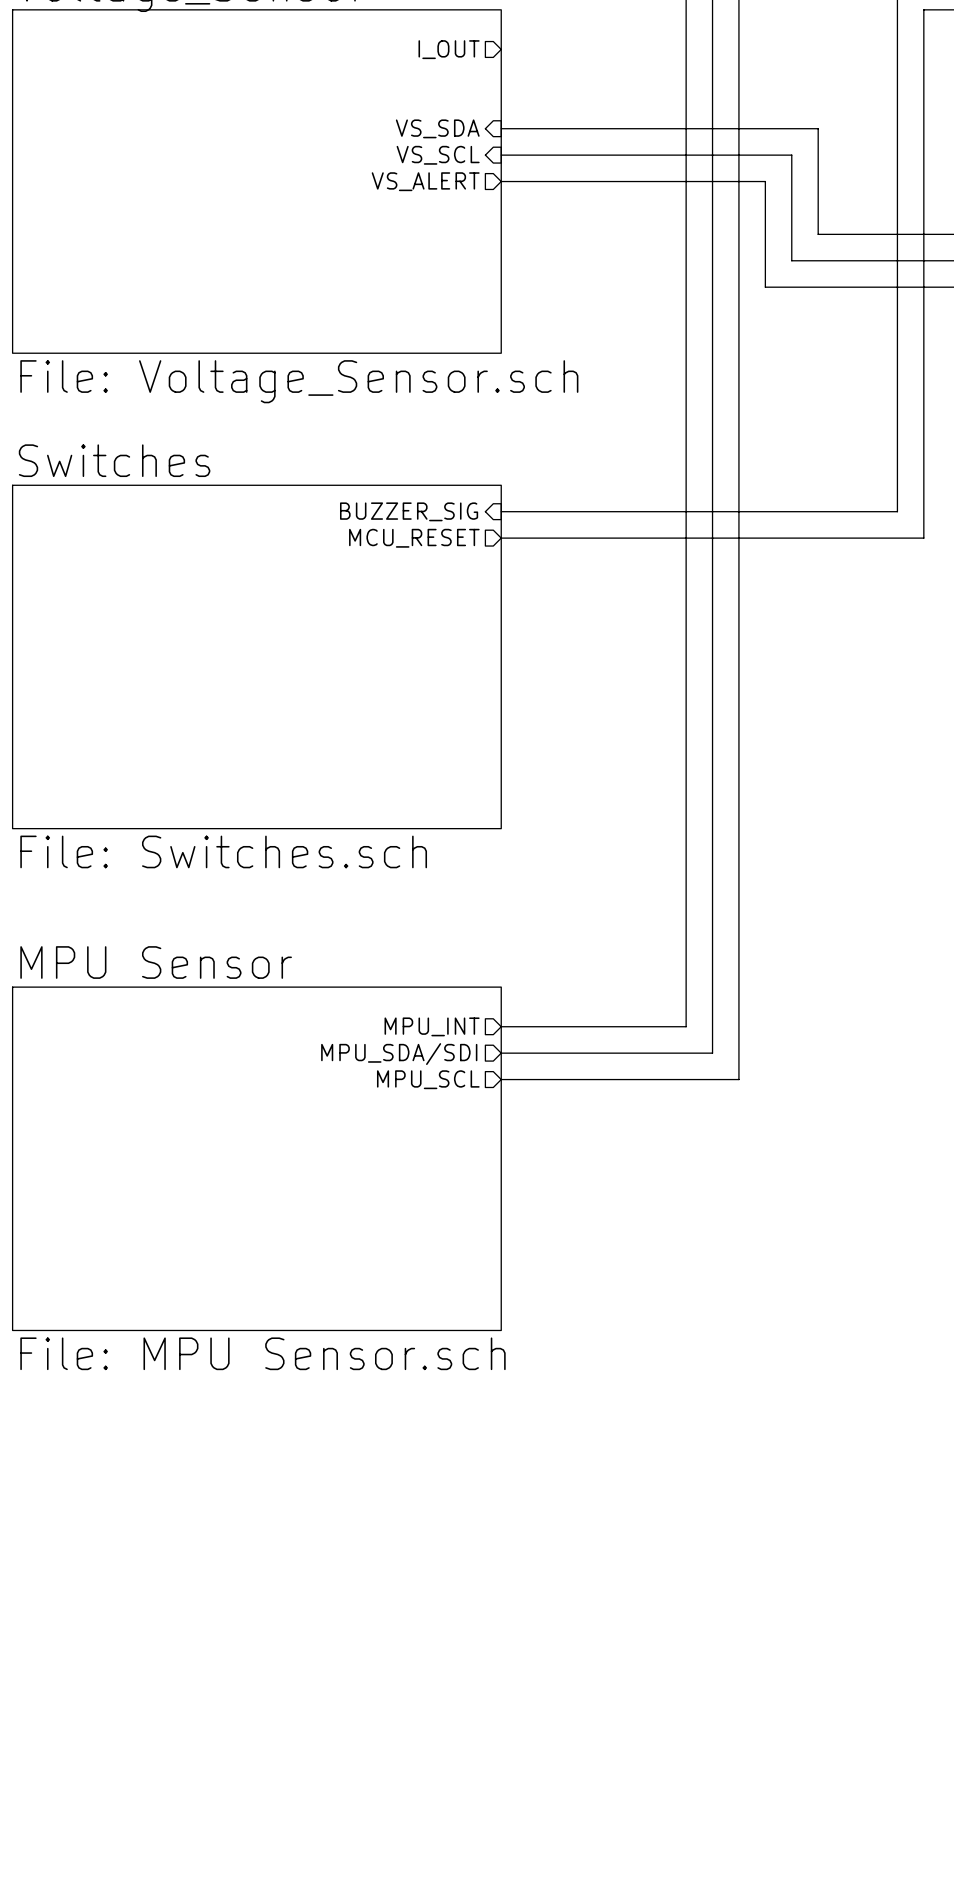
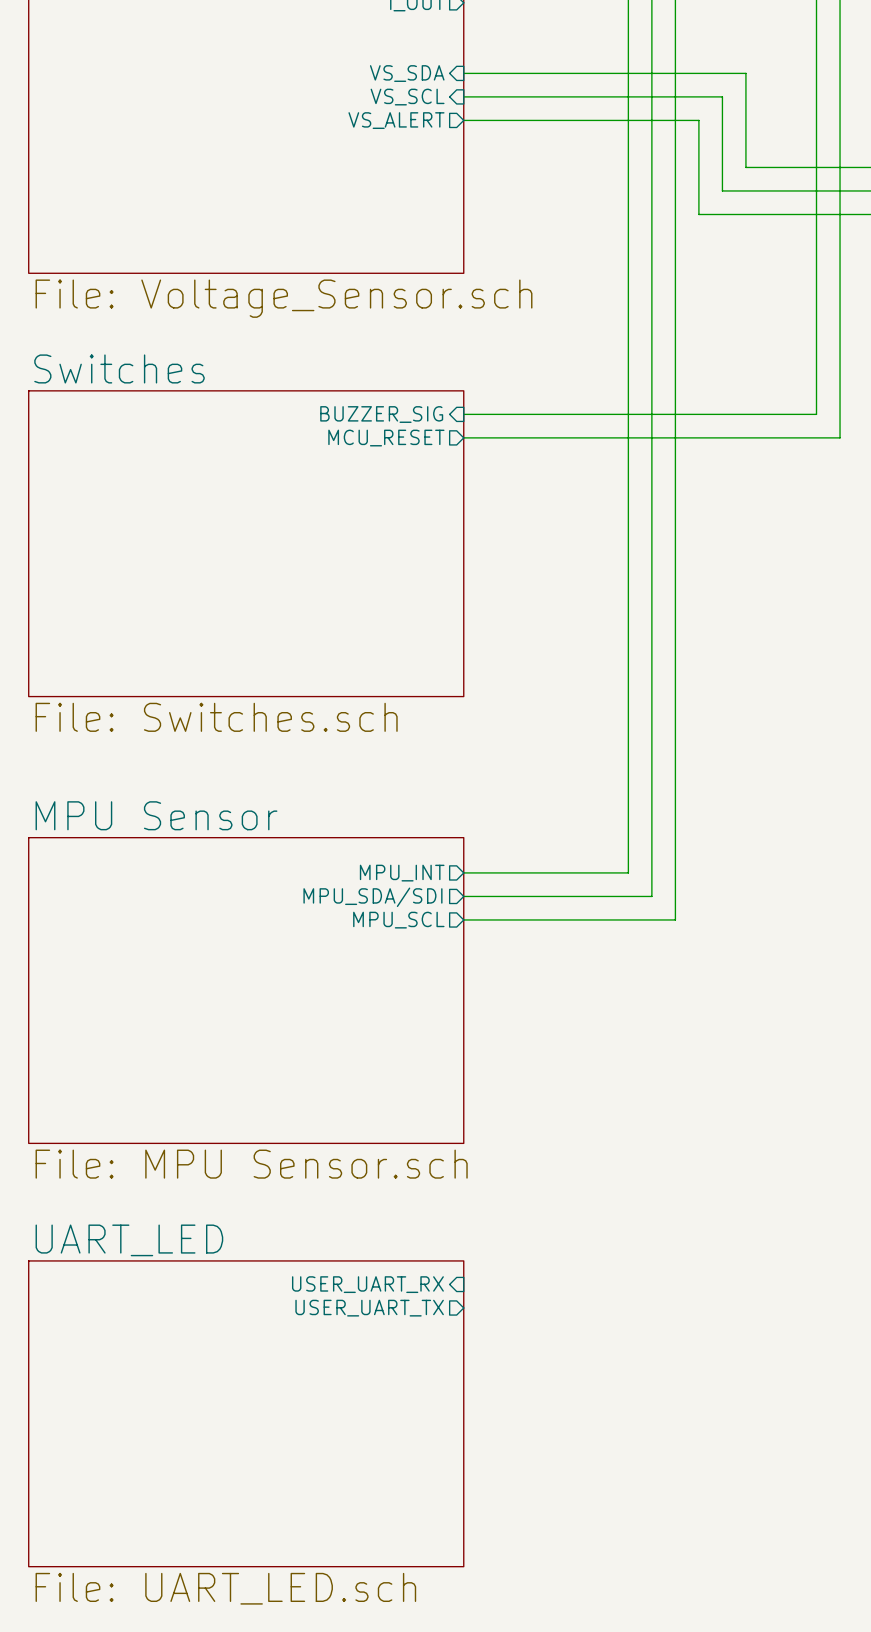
sheet pin: none -> USER_UART_RX (367, 1284)
sheet pin: none -> USER_UART_TX (369, 1308)
sheet UART_LED: none -> File: UART_LED.sch (246, 1413)

